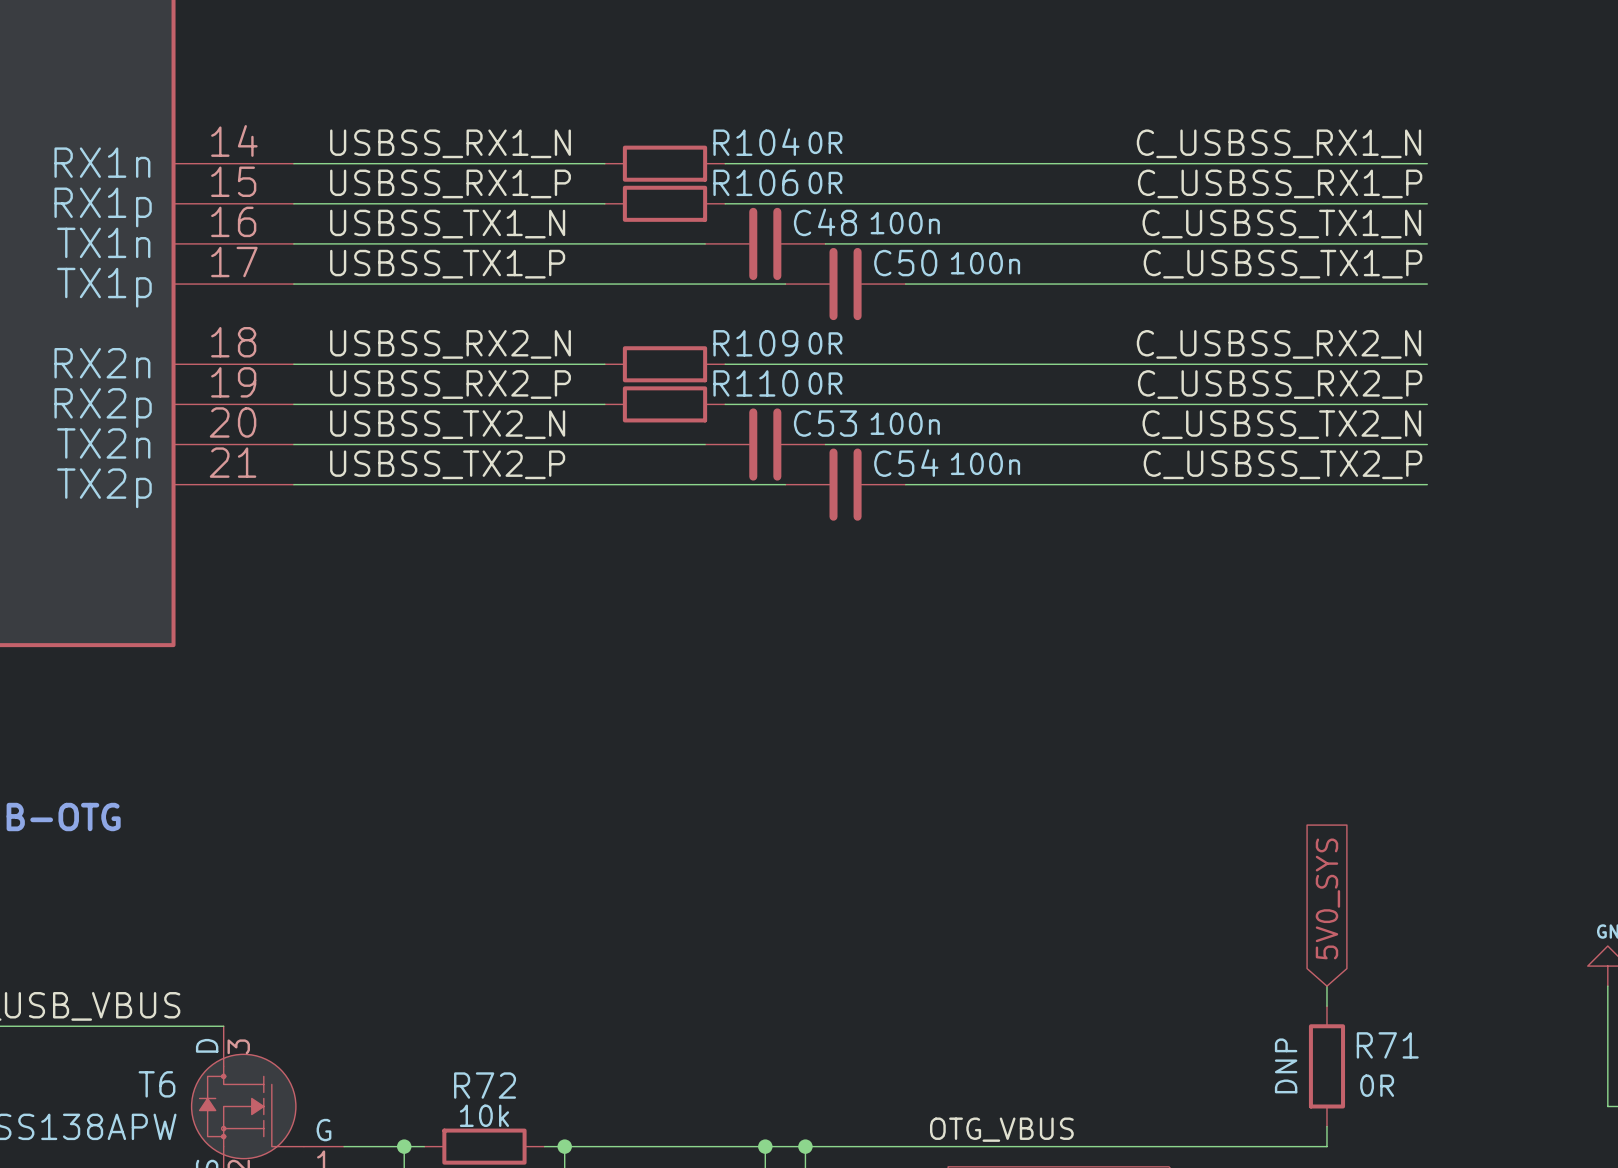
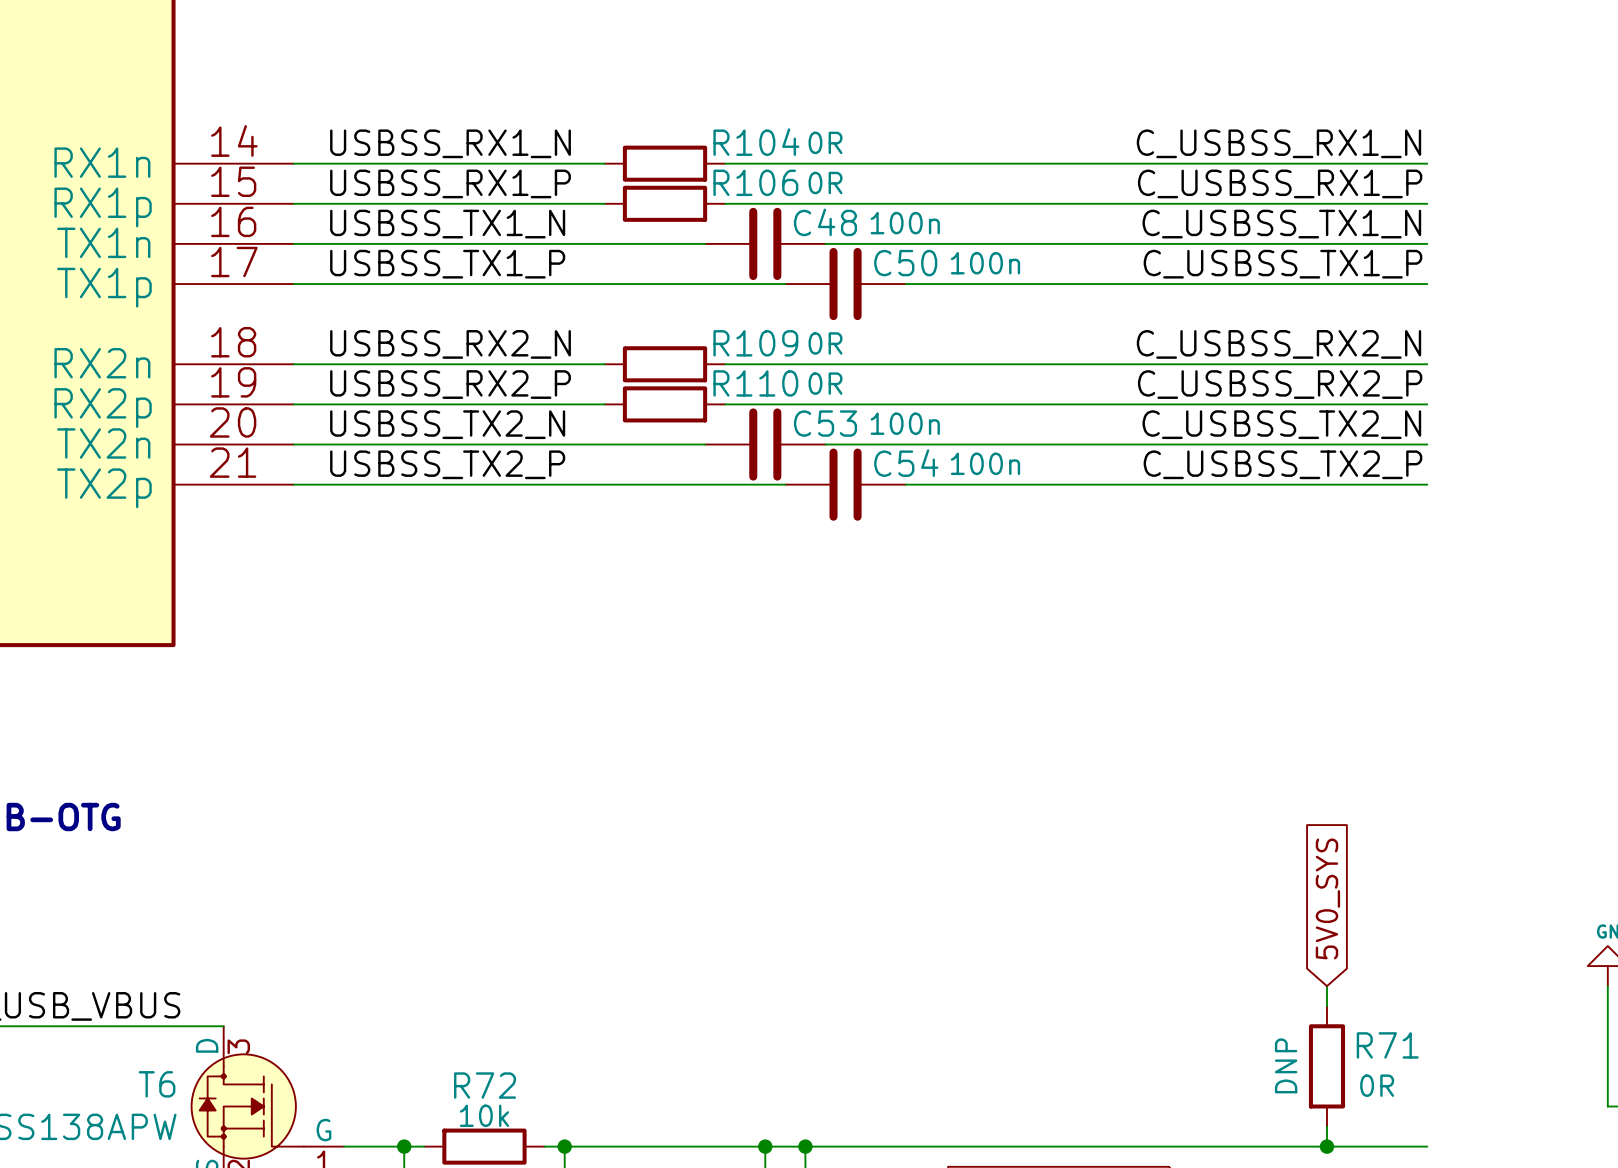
label: OTG_VBUS (1001, 1129) -> none
wire: none -> (1326, 1146) (1427, 1146)
junction: none -> (1326, 1146)

